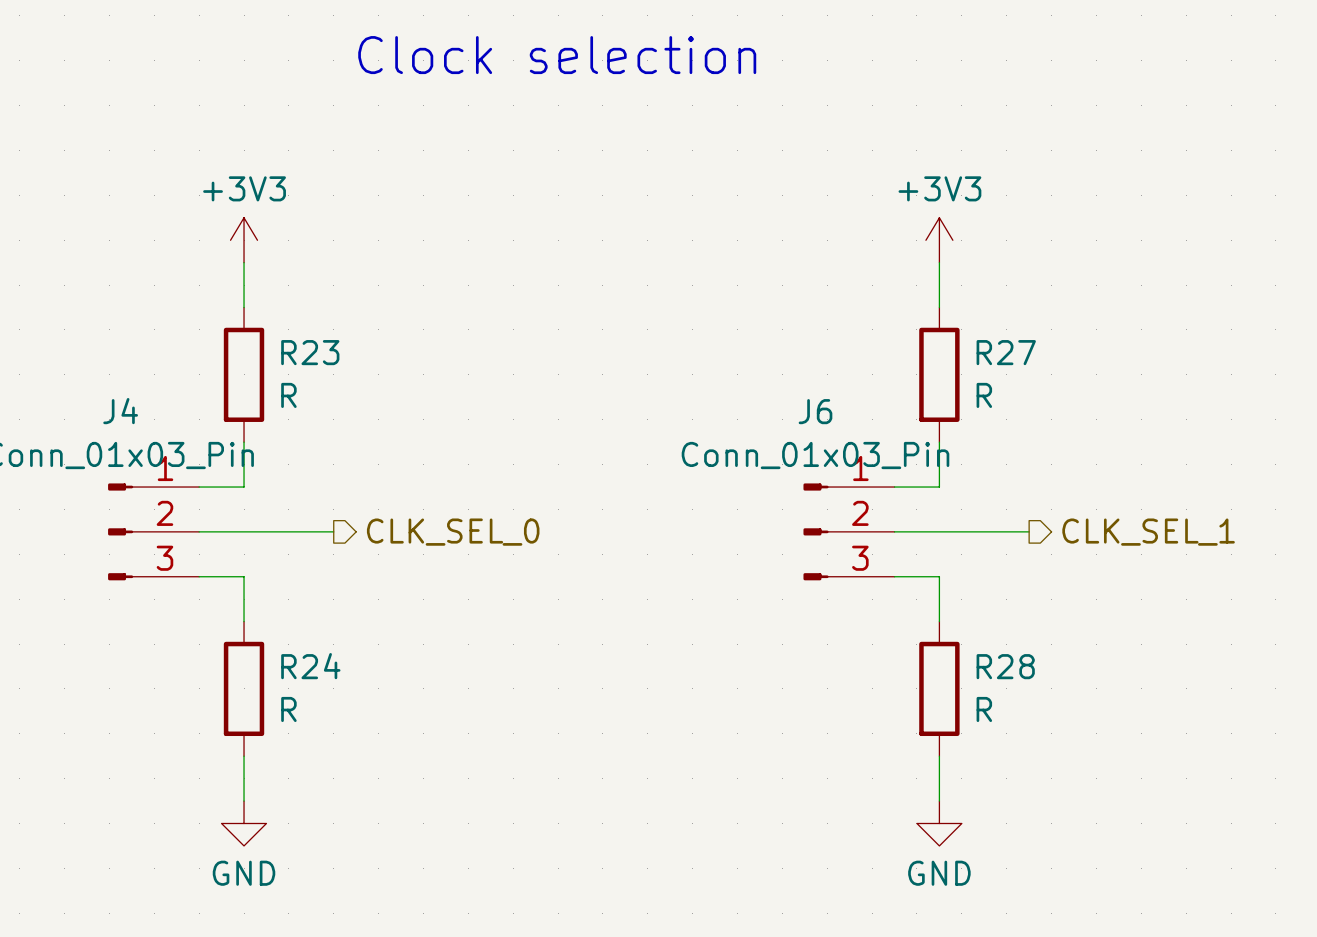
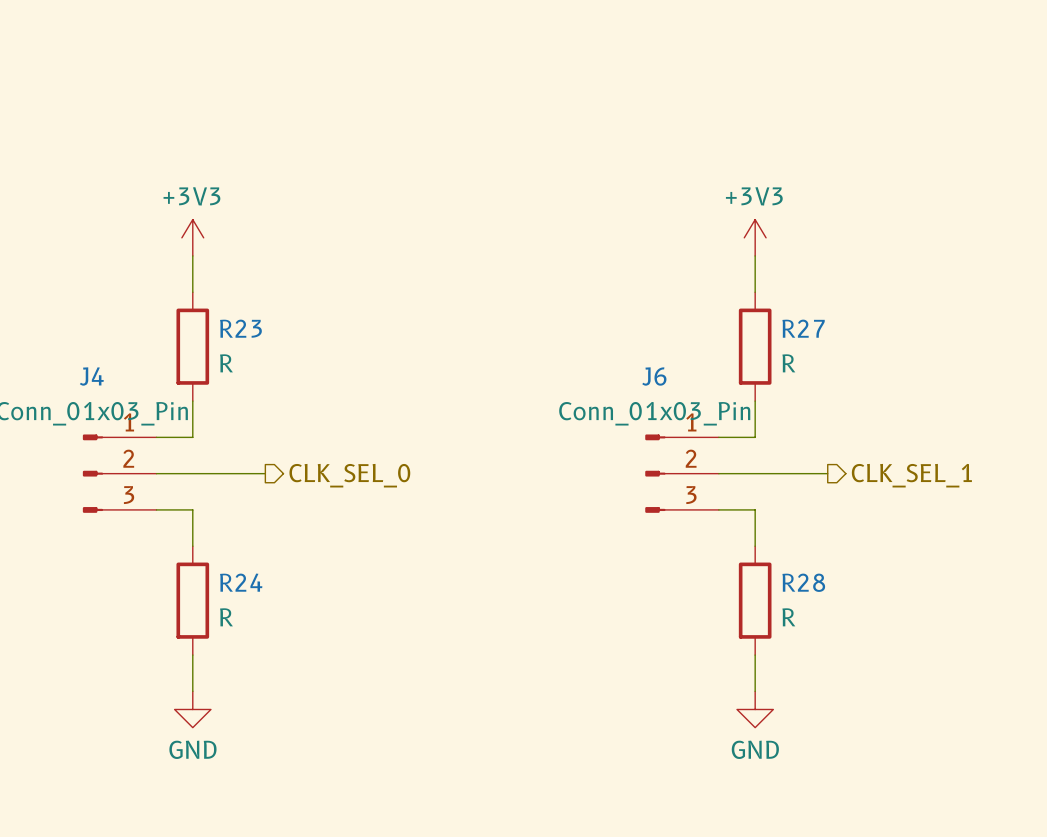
text: Clock selection (557, 55) -> none

